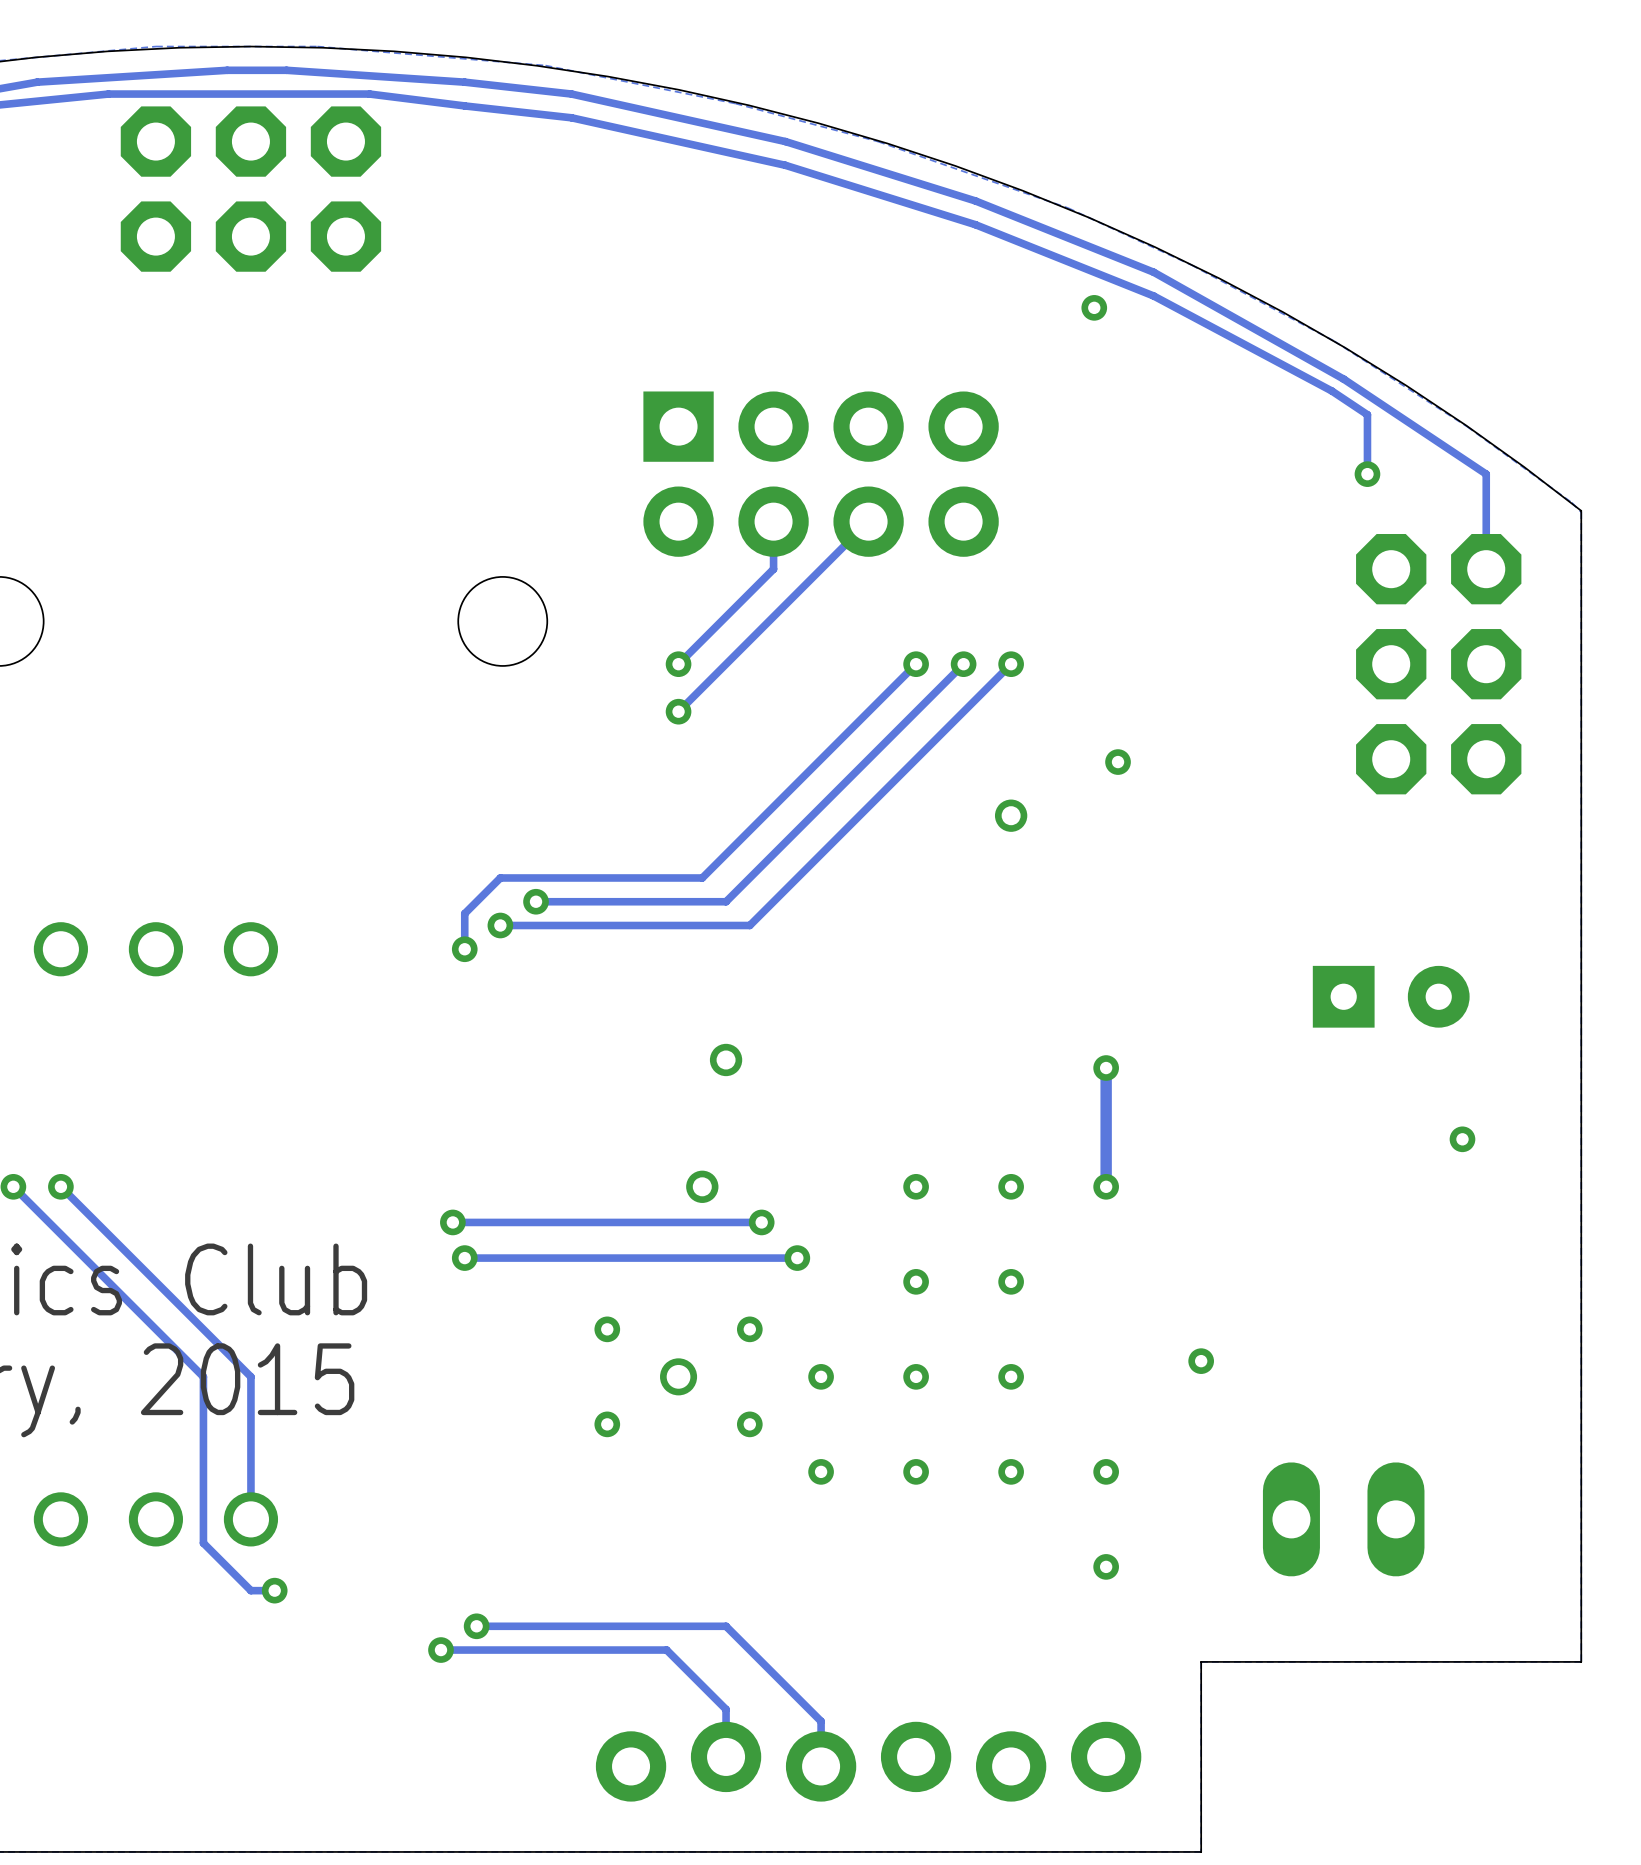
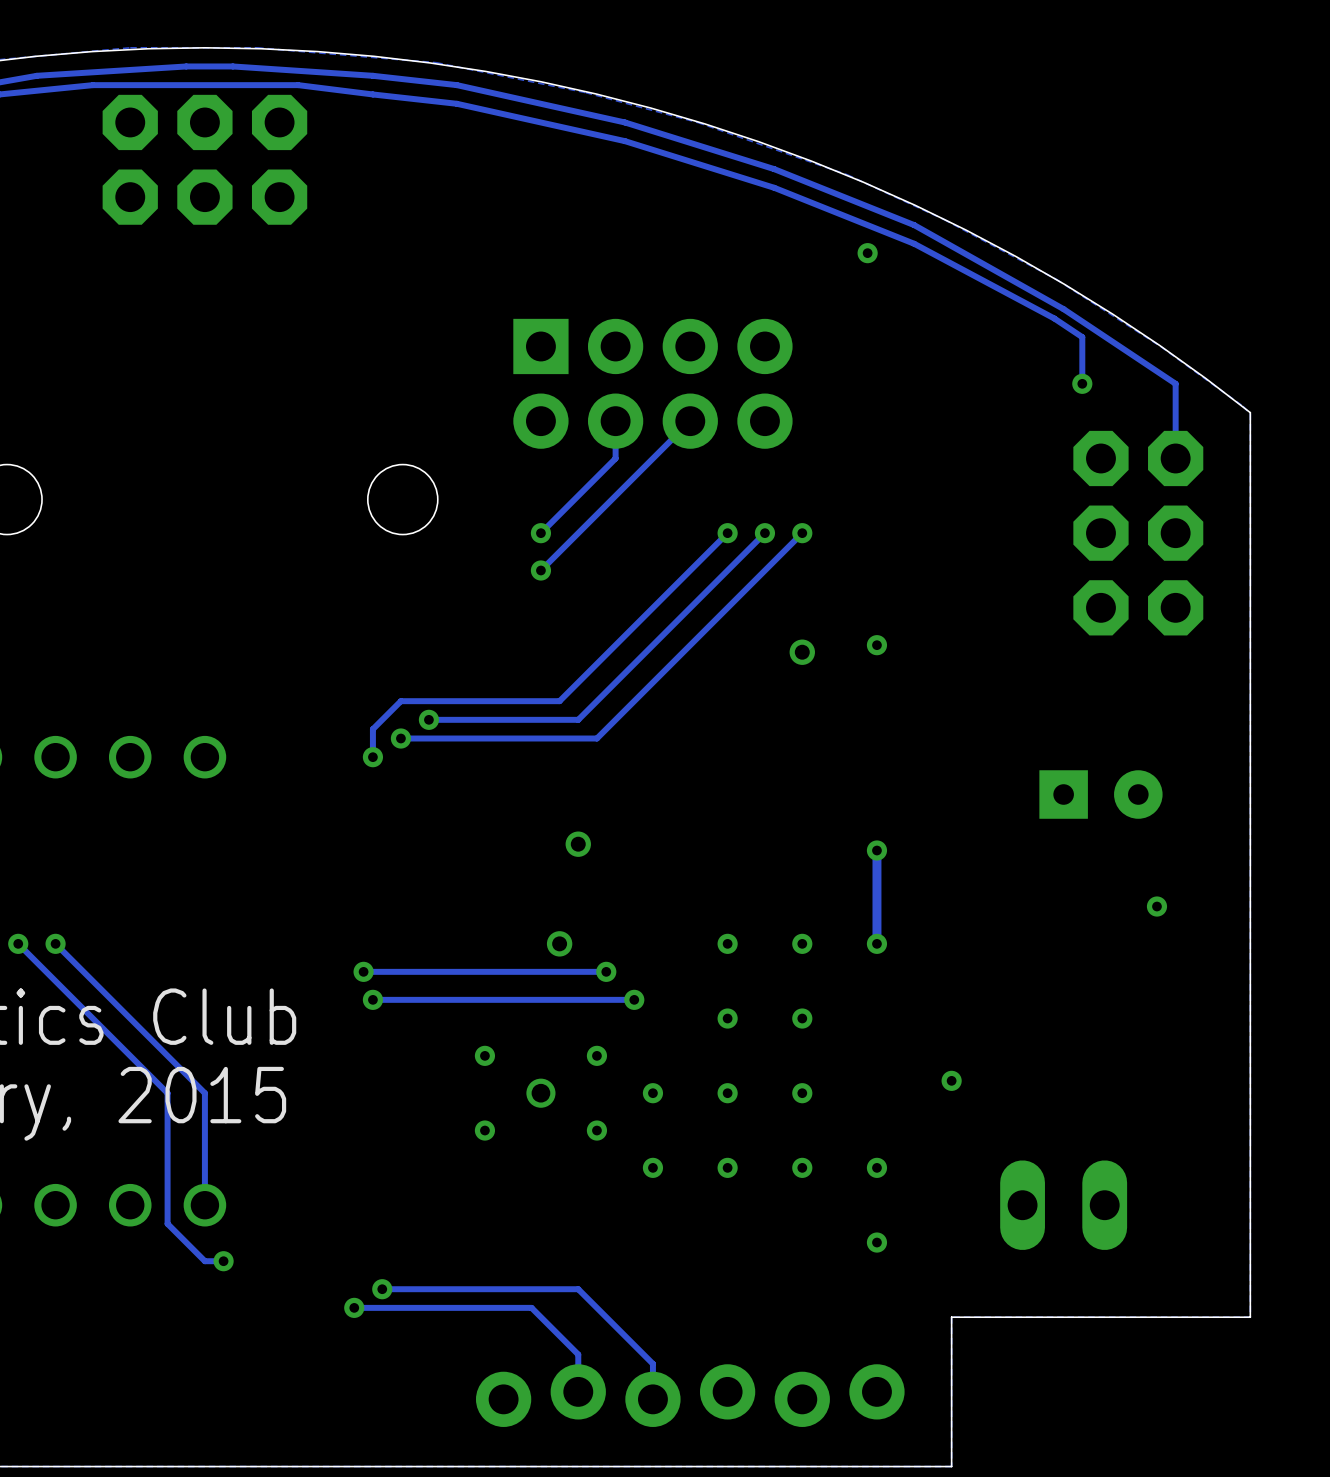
via position: (1118, 762) -> (876, 645)

